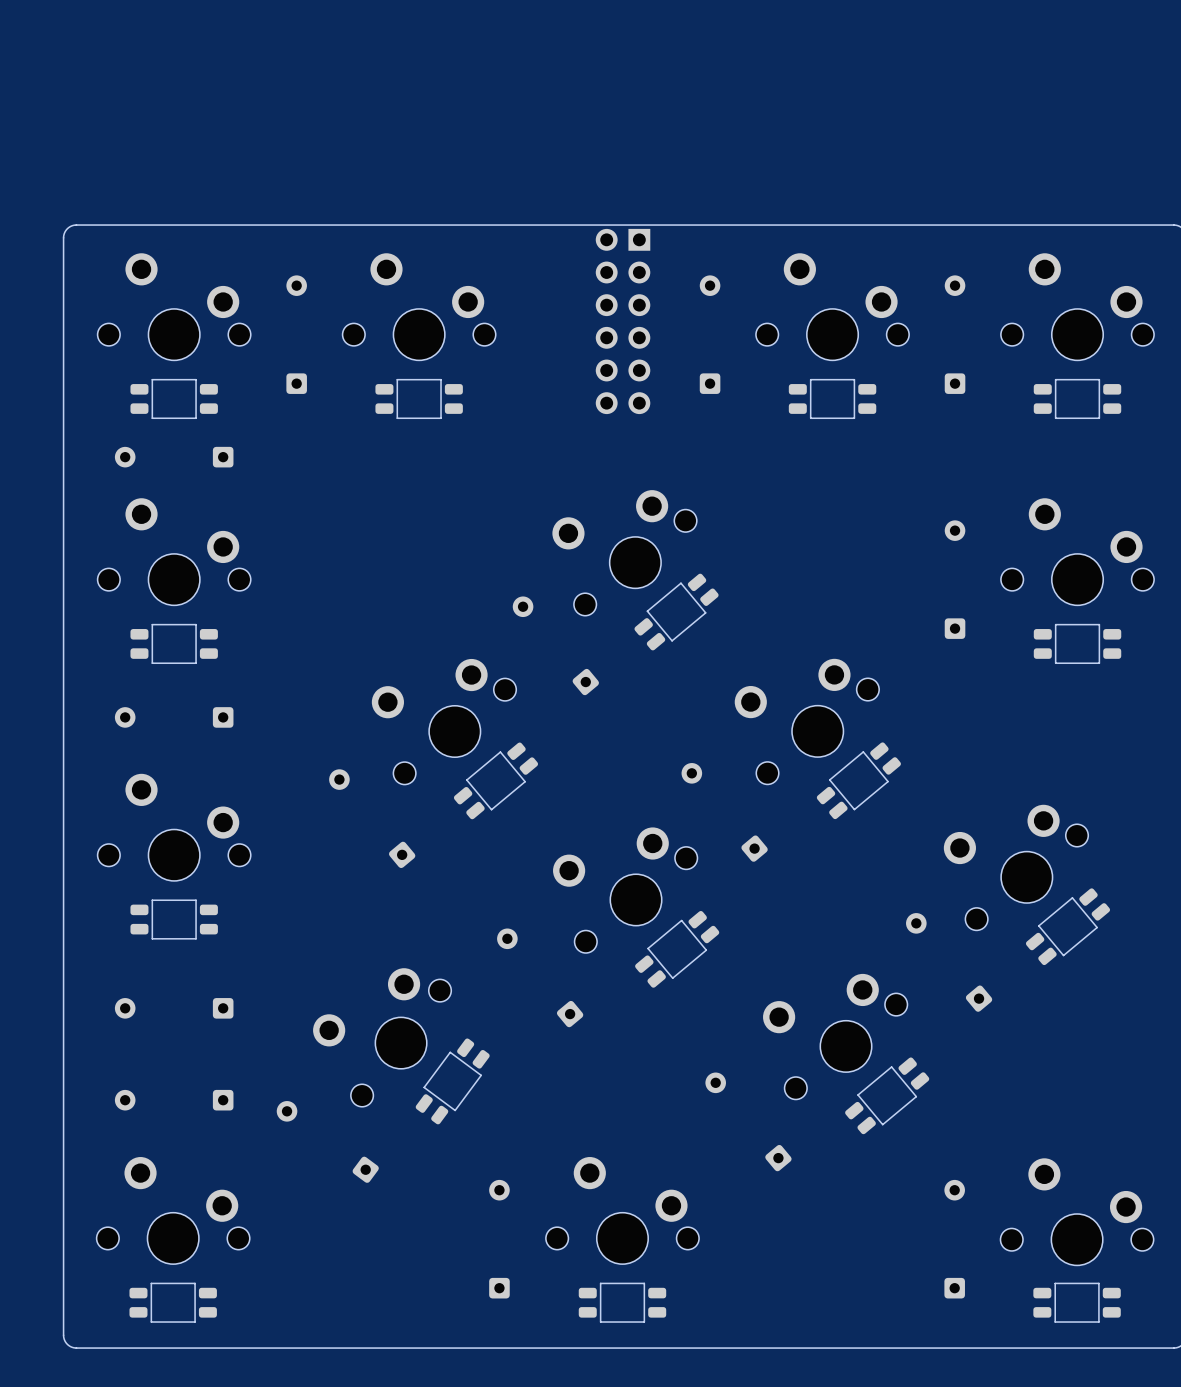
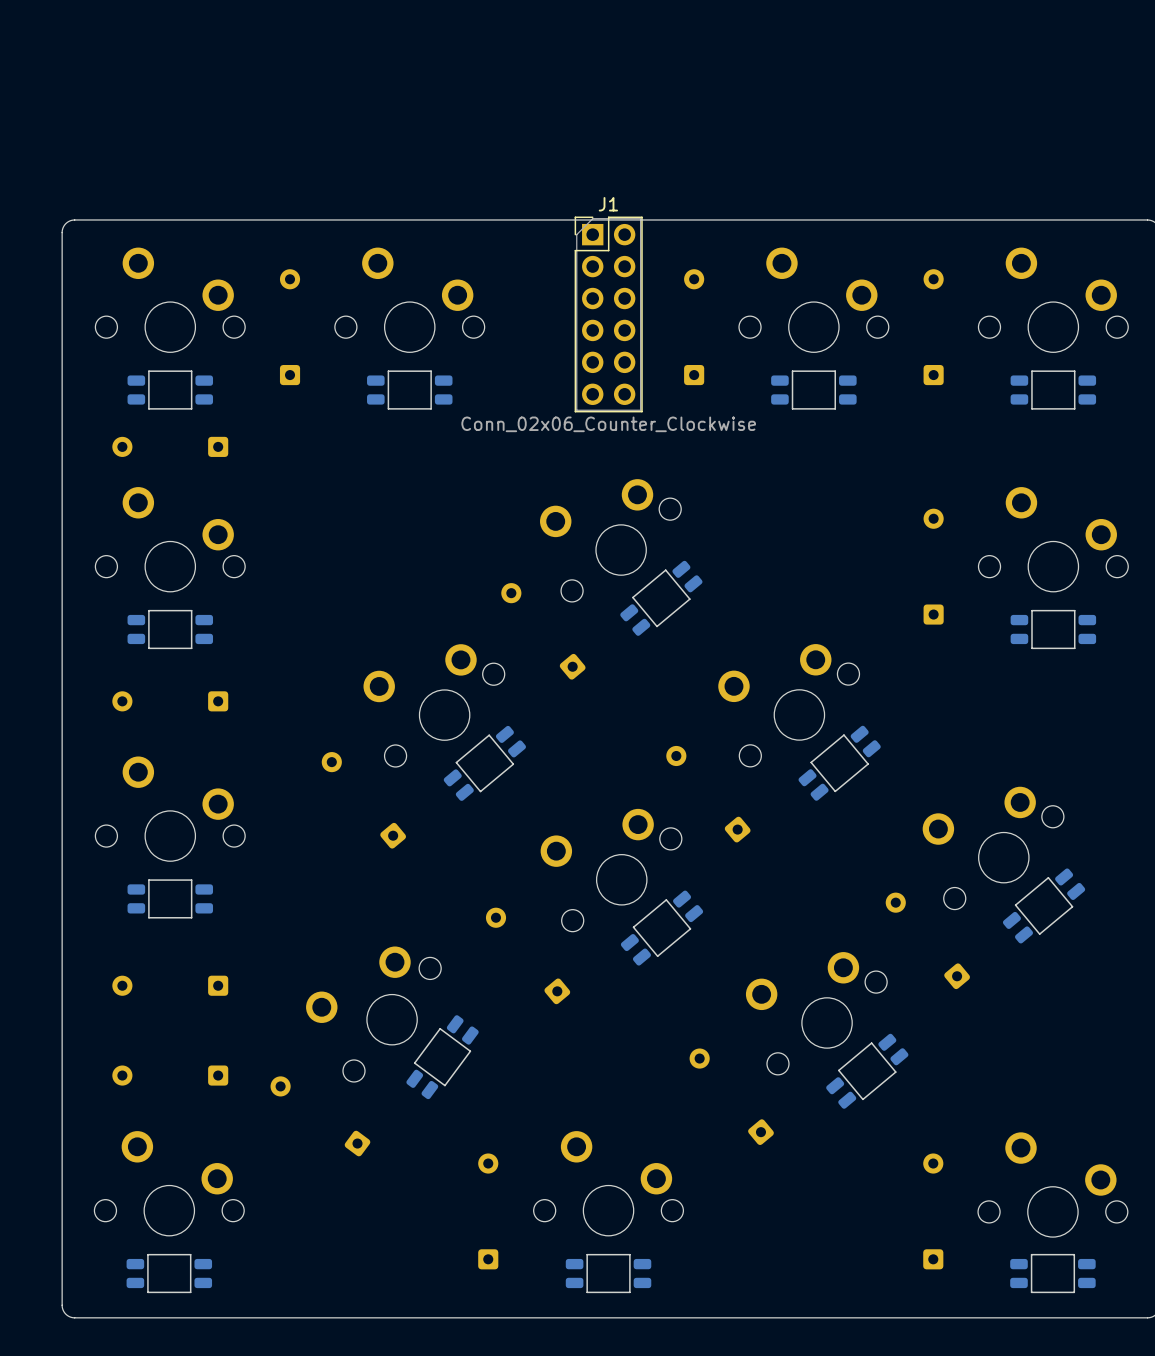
J1 side: top (623, 321) -> bottom (608, 314)

